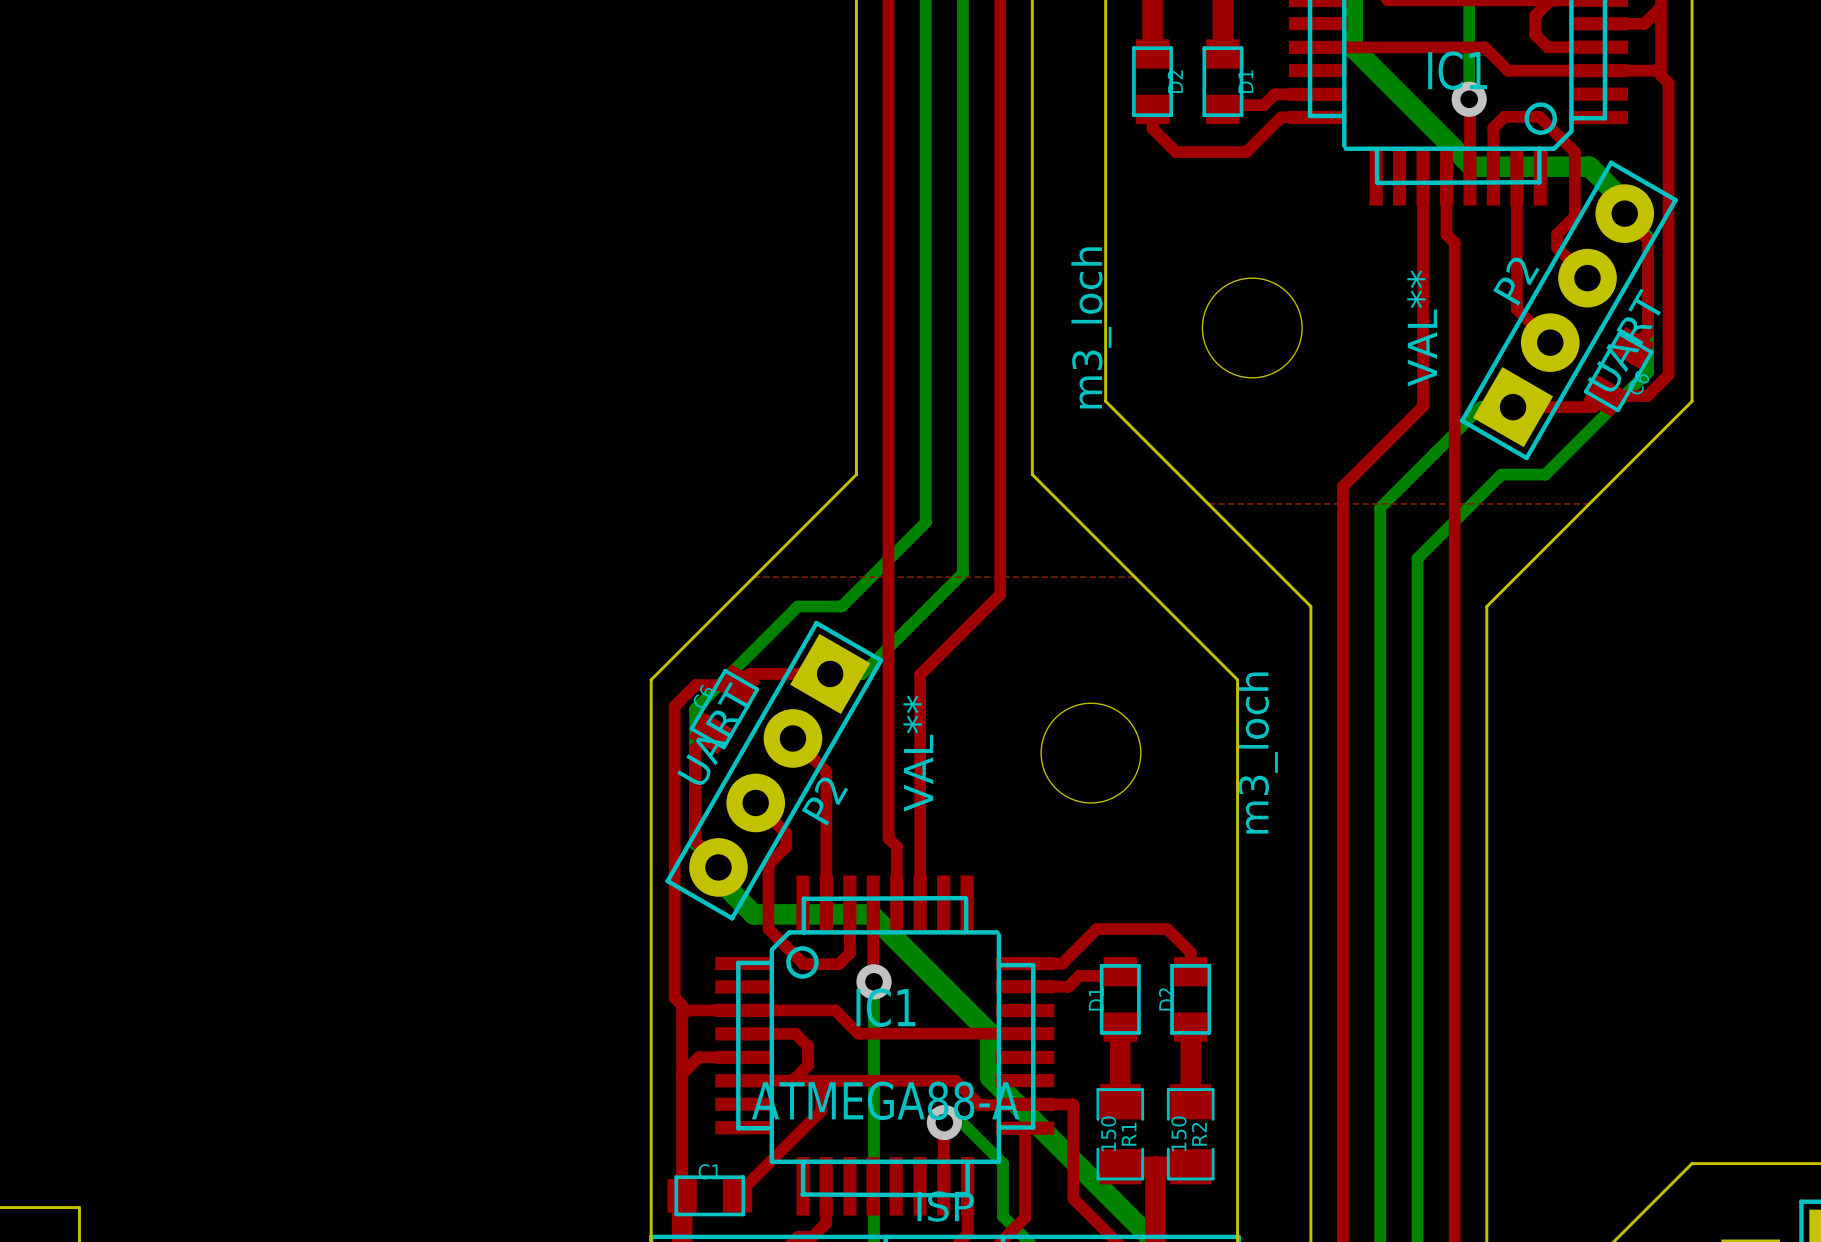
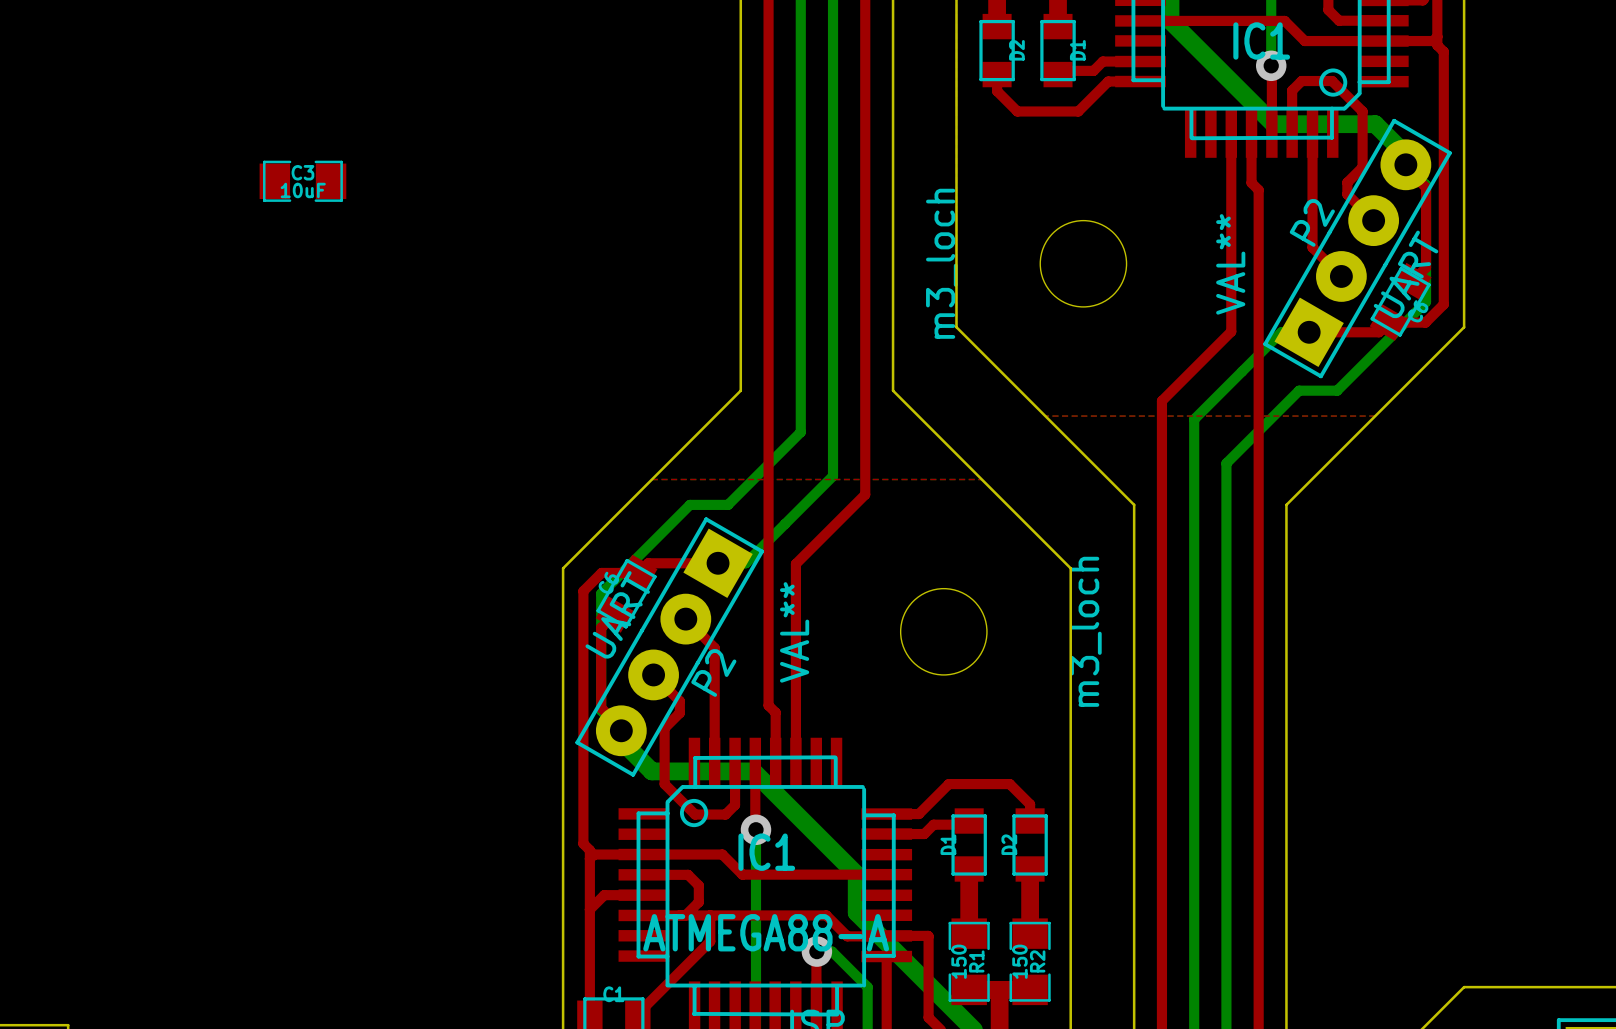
C3: none -> 10uF (302, 181)

